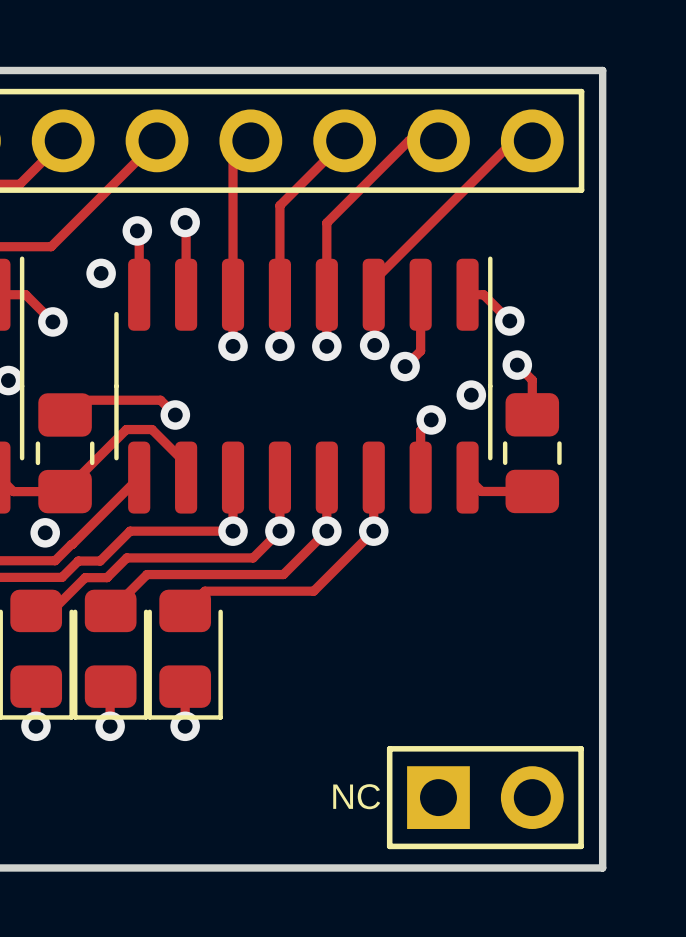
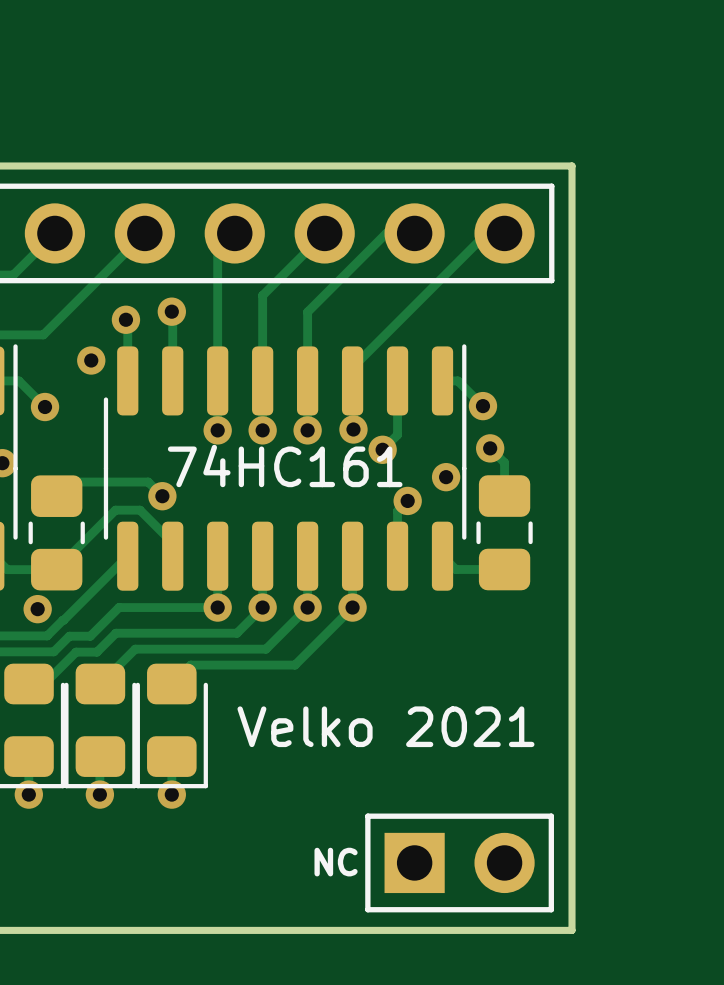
part value: none -> 74HC161 (285, 465)
text: none -> Velko 2021 (385, 726)

